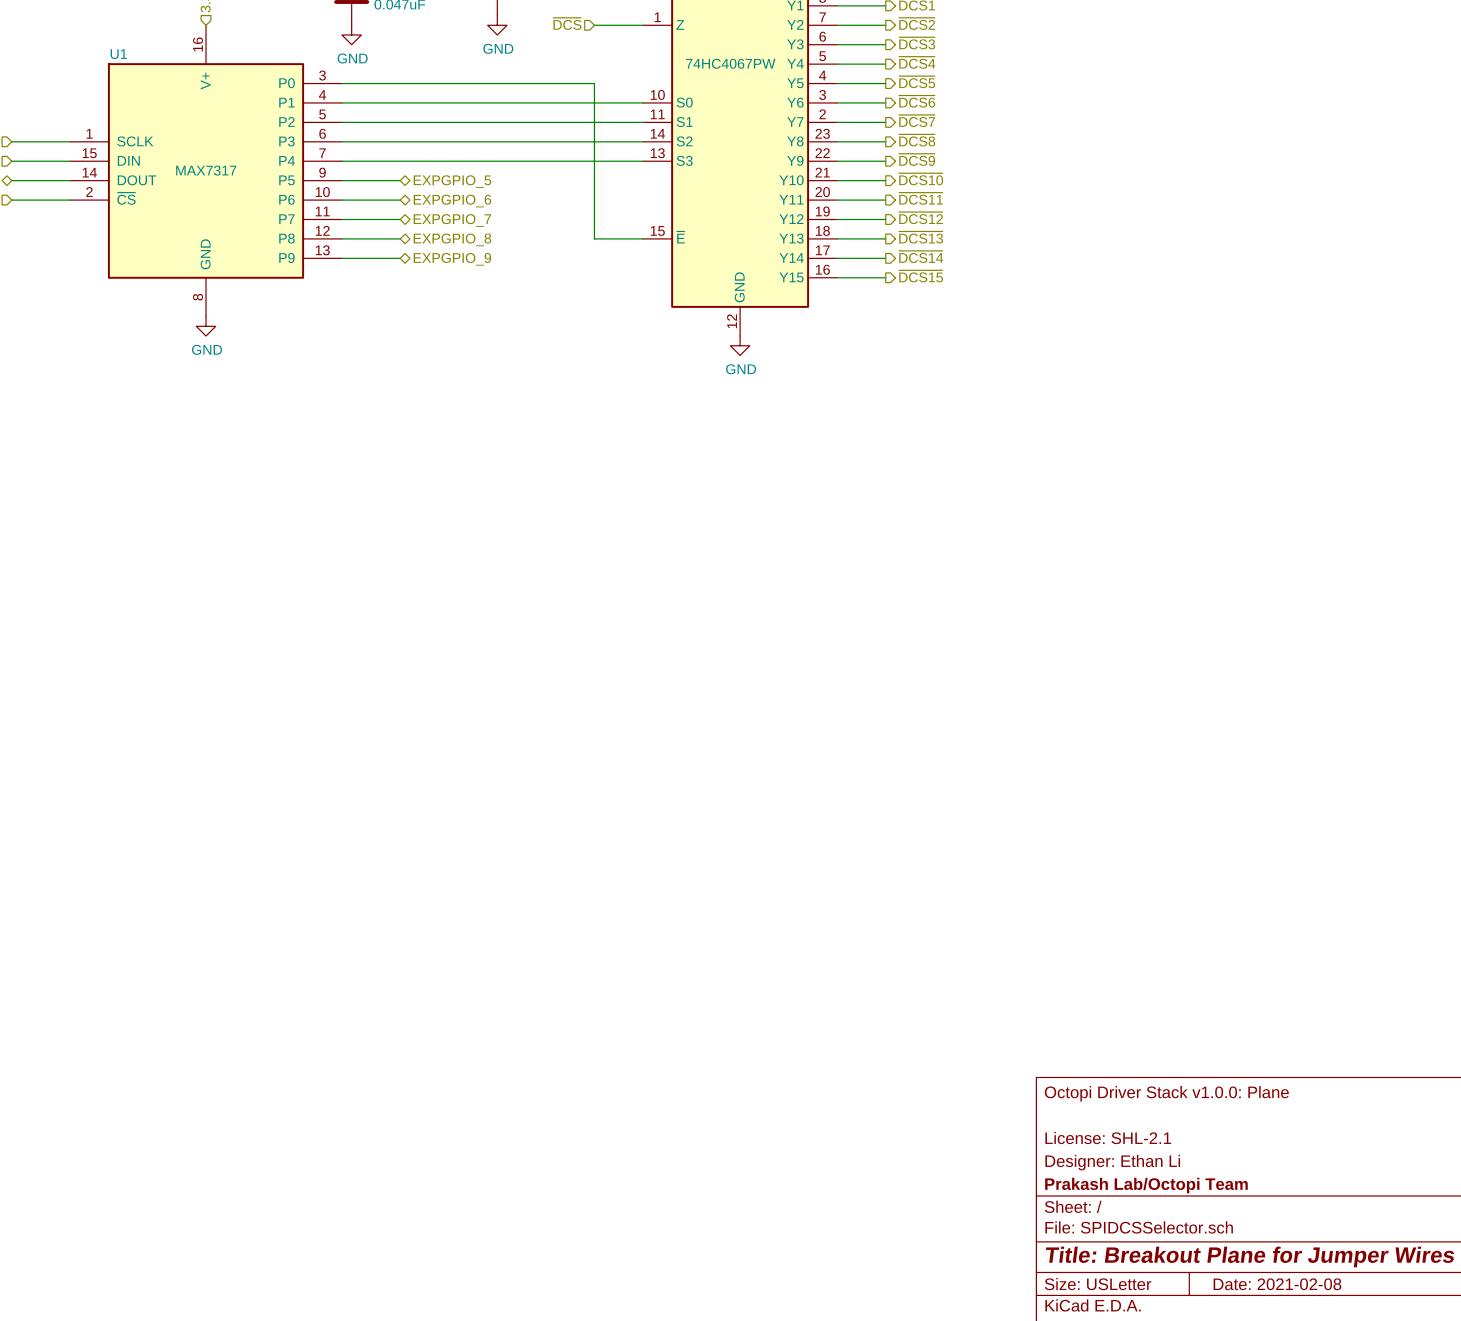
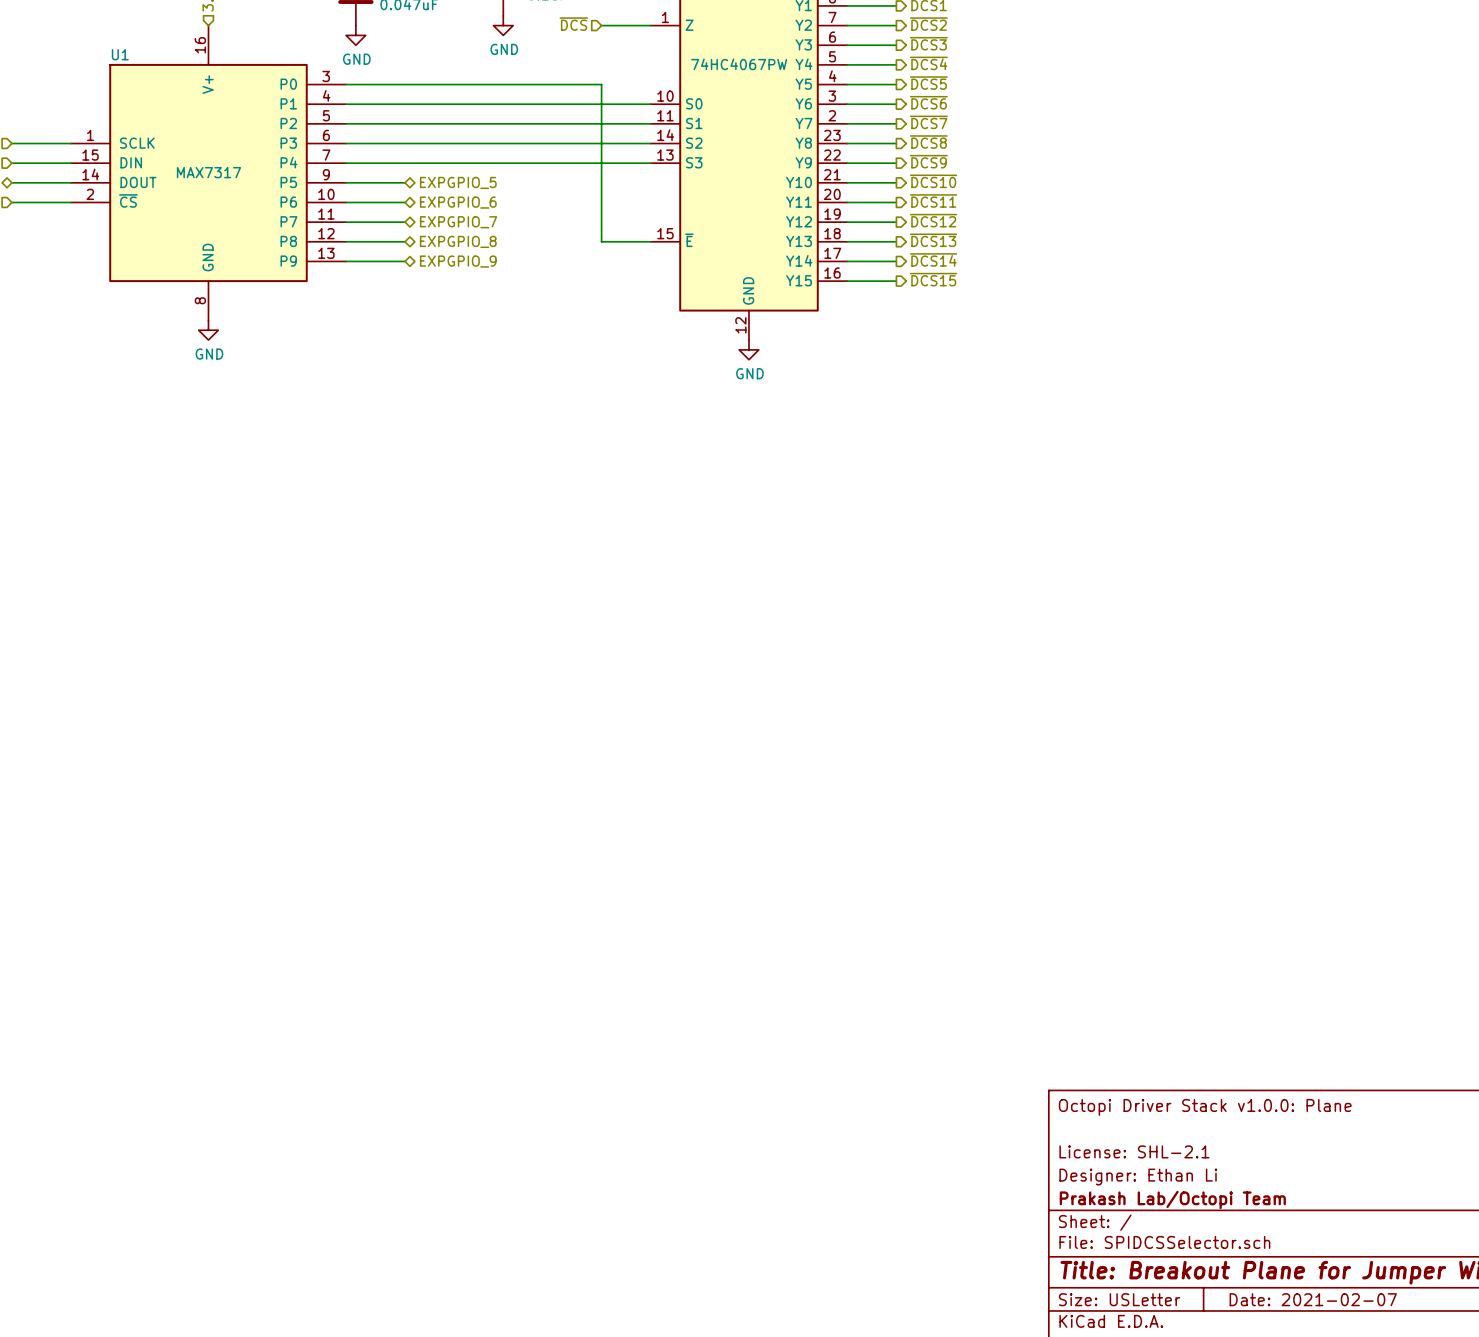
title block: Date: 2021-02-08 (1277, 1284) -> Date: 2021-02-07 (1313, 1299)

